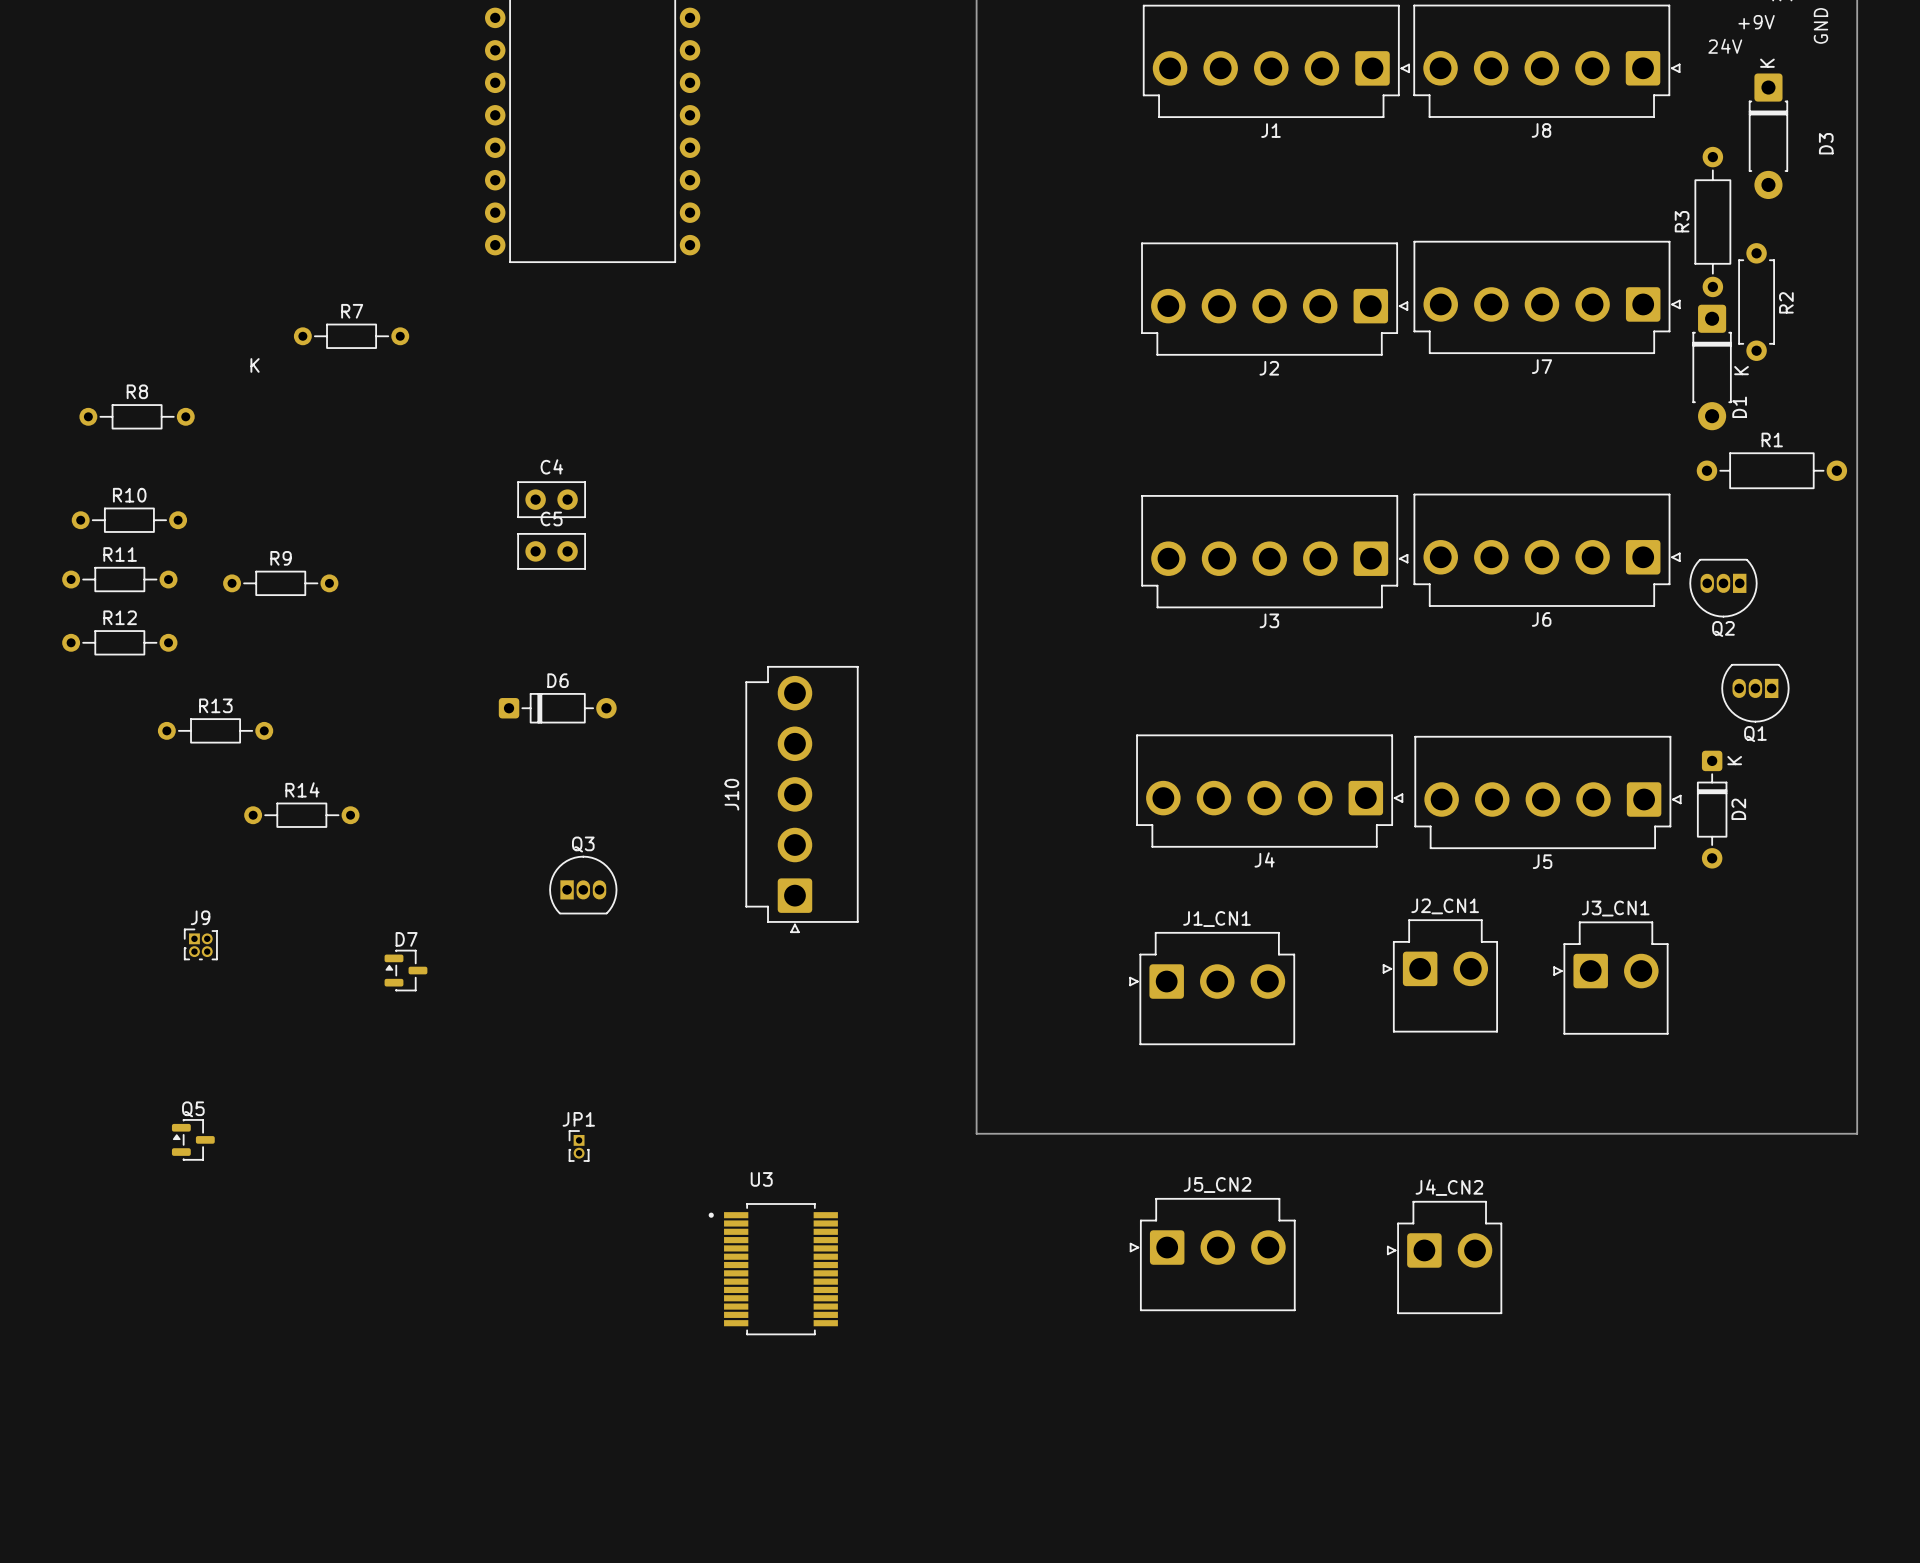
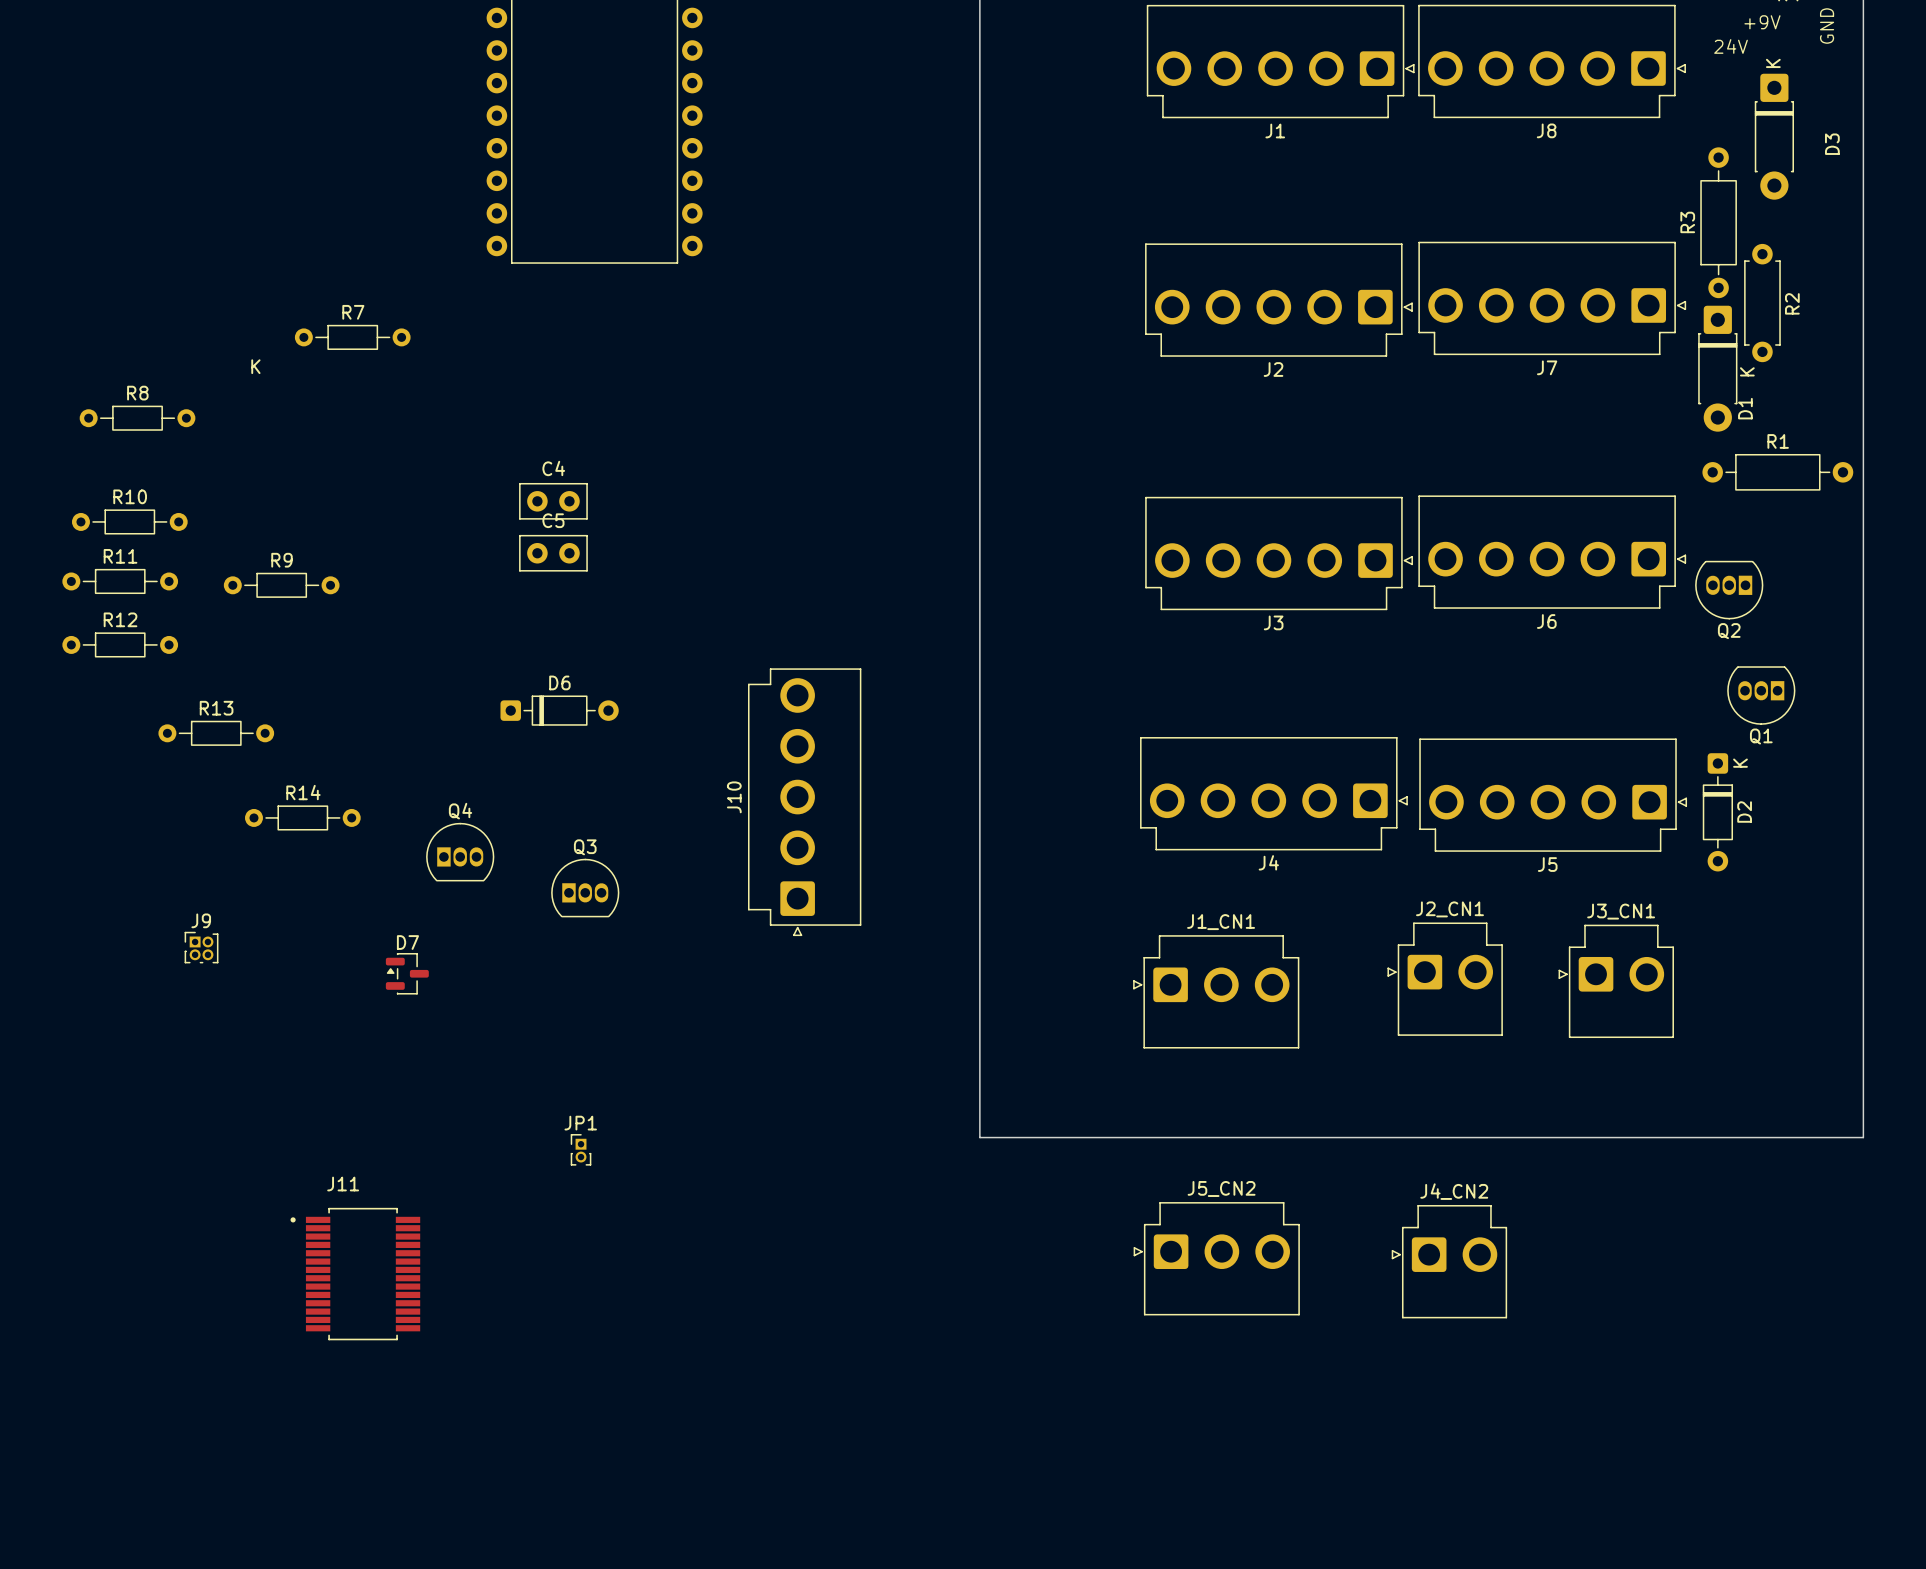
Q4: none -> (460, 852)
Q5: (193, 1139) -> none
J11: none -> (355, 1274)
U3: (773, 1269) -> none

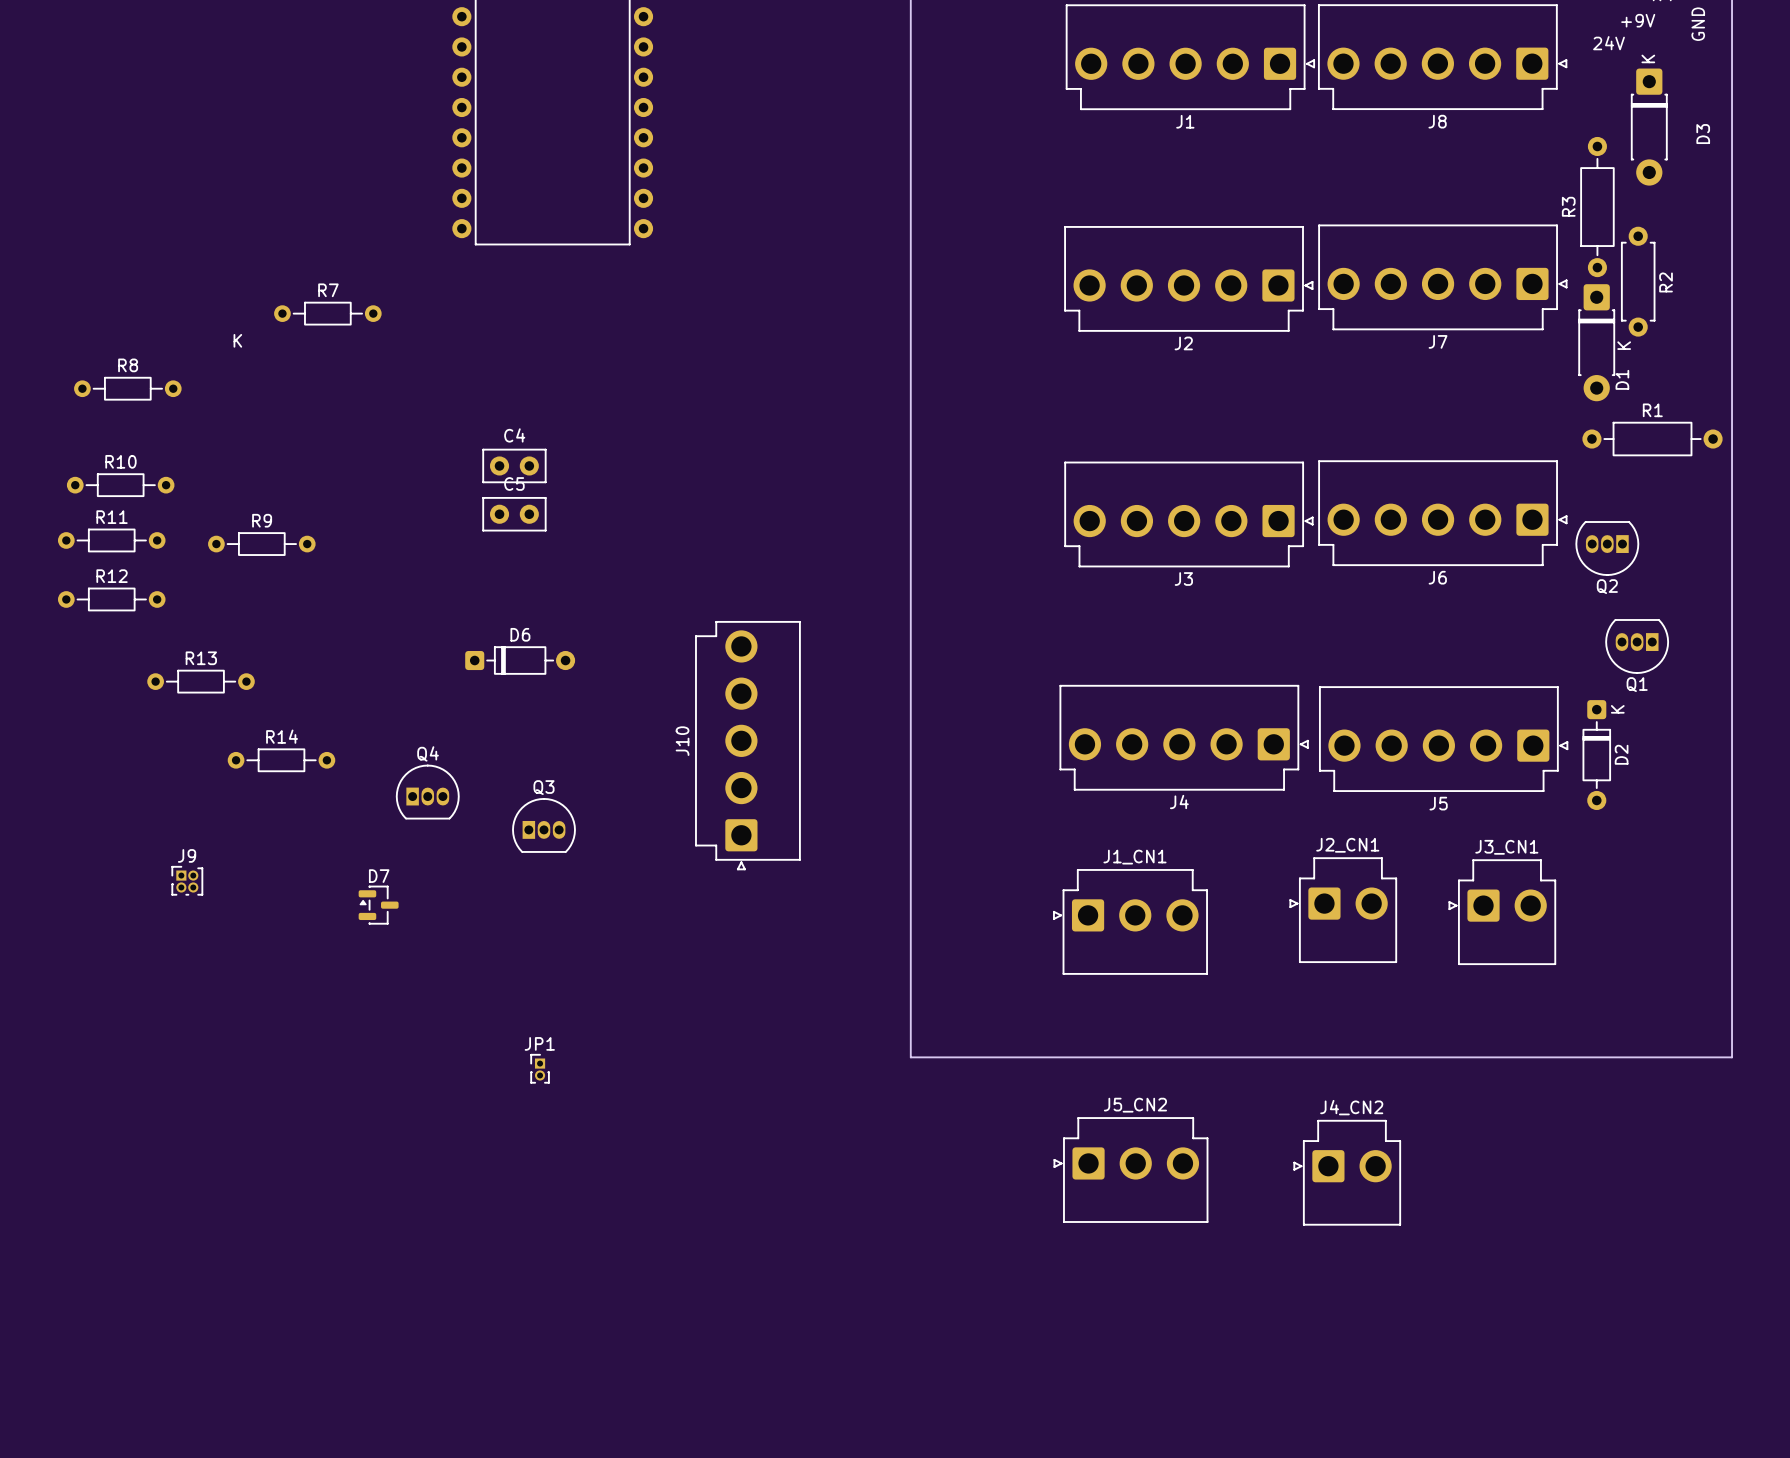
J11: (355, 1274) -> none

